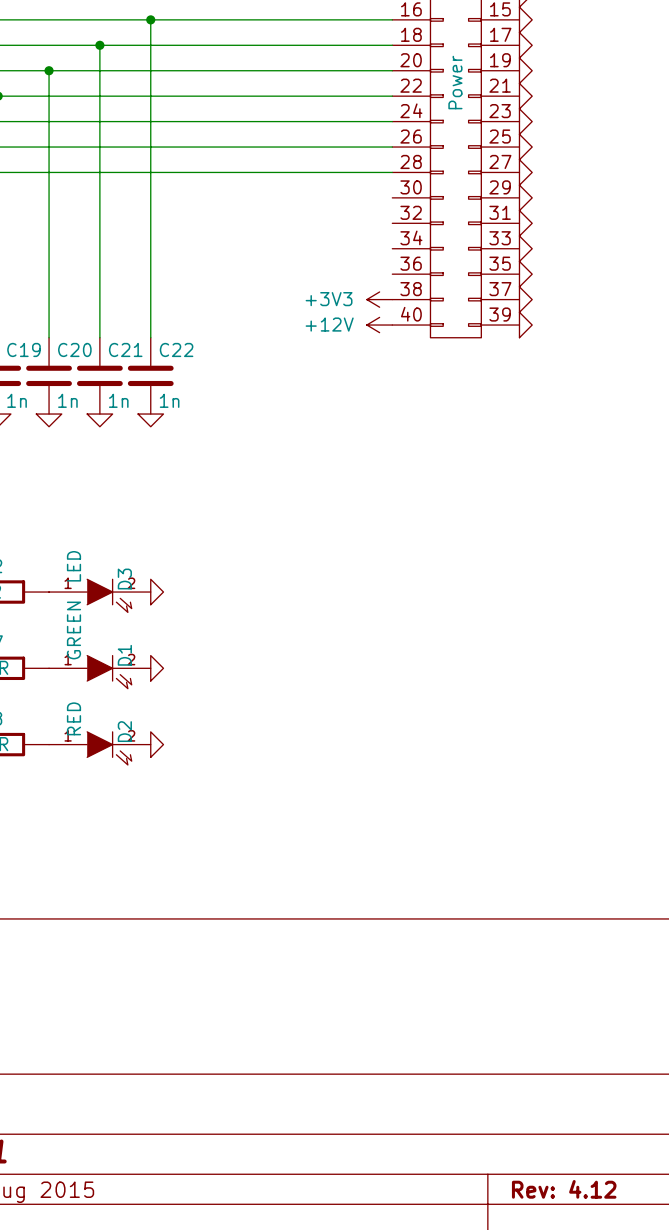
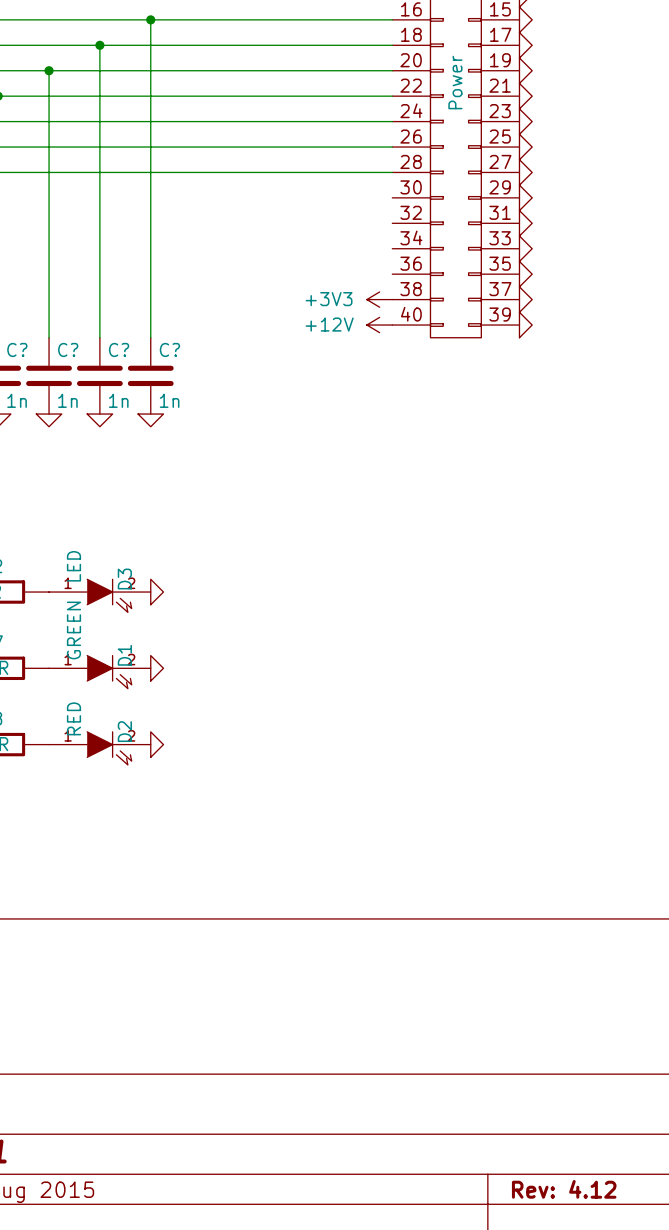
C19 name: C19 (24, 349) -> C? (17, 349)
C20 name: C20 (74, 349) -> C? (68, 349)
C21 name: C21 (125, 349) -> C? (119, 349)
C22 name: C22 (176, 349) -> C? (169, 349)

